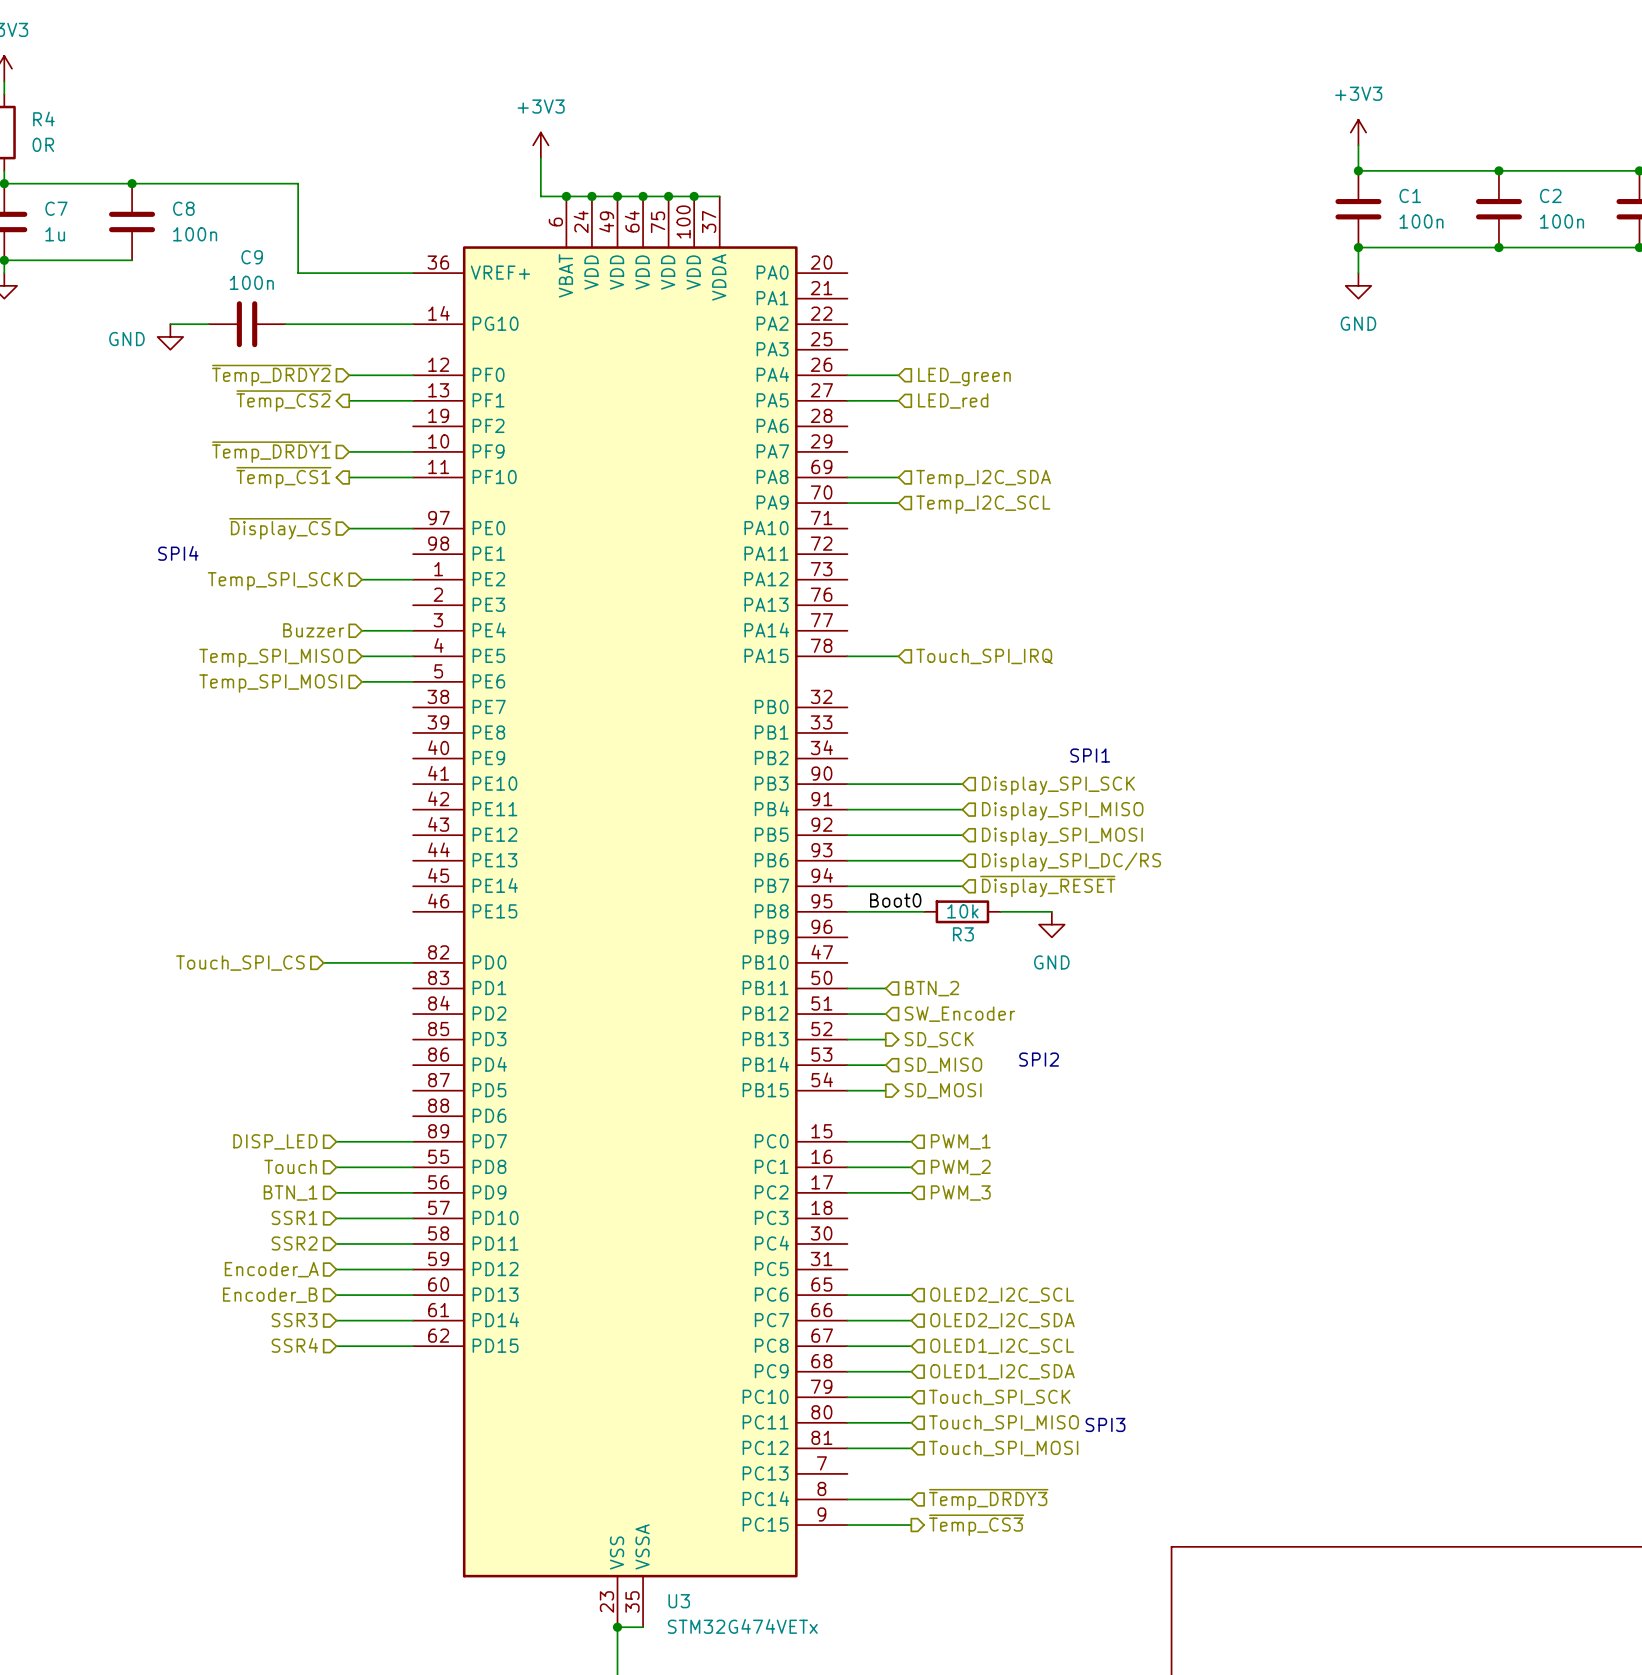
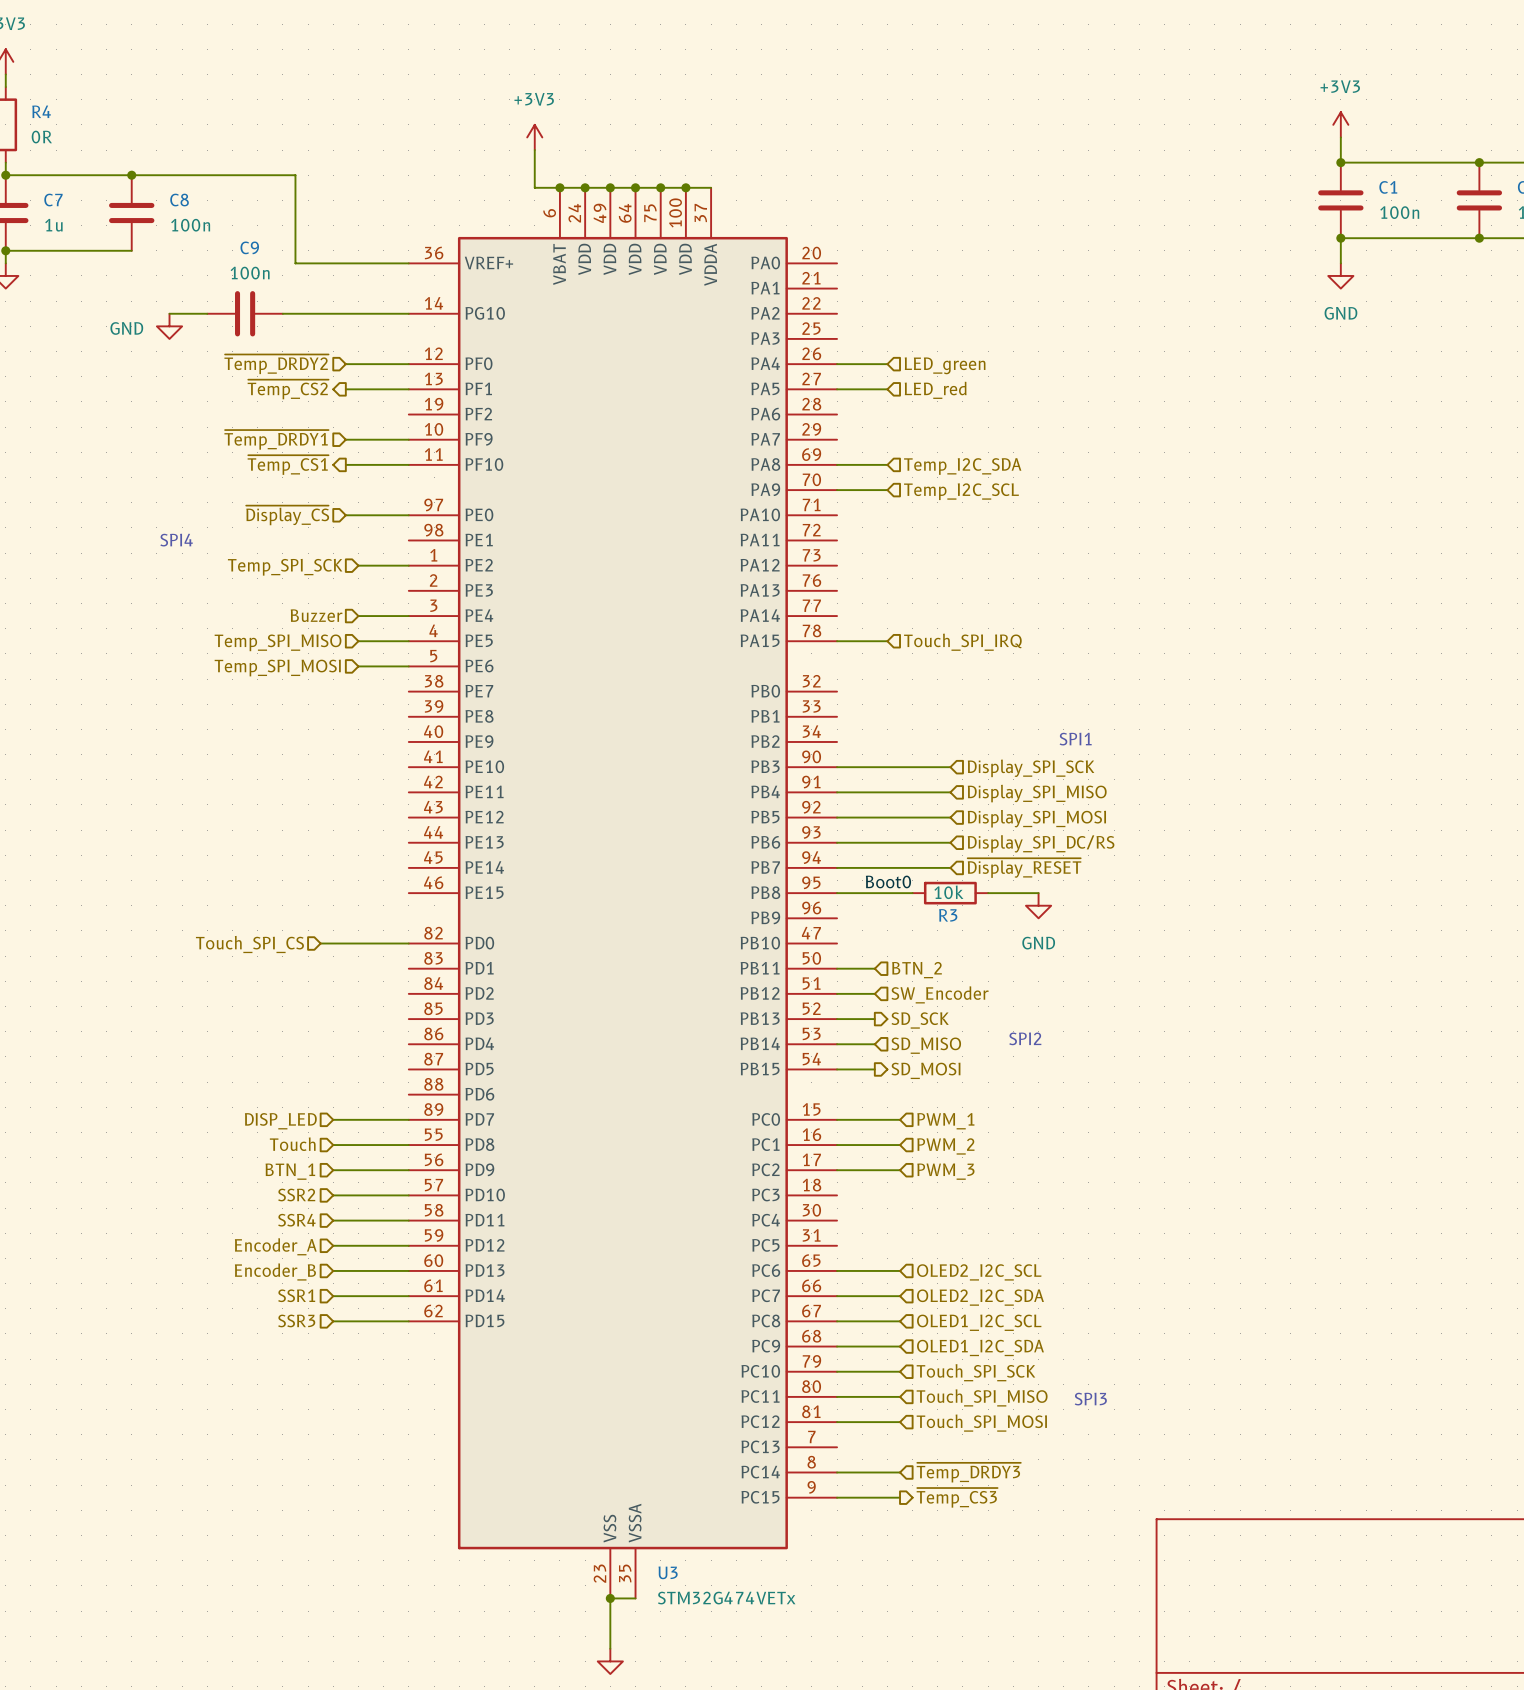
hierarchical label: SSR1 (294, 1217) -> SSR2 (296, 1195)
hierarchical label: SSR2 (294, 1243) -> SSR4 (296, 1220)
hierarchical label: SSR3 (294, 1320) -> SSR1 (296, 1295)
hierarchical label: SSR4 (294, 1345) -> SSR3 (296, 1320)

